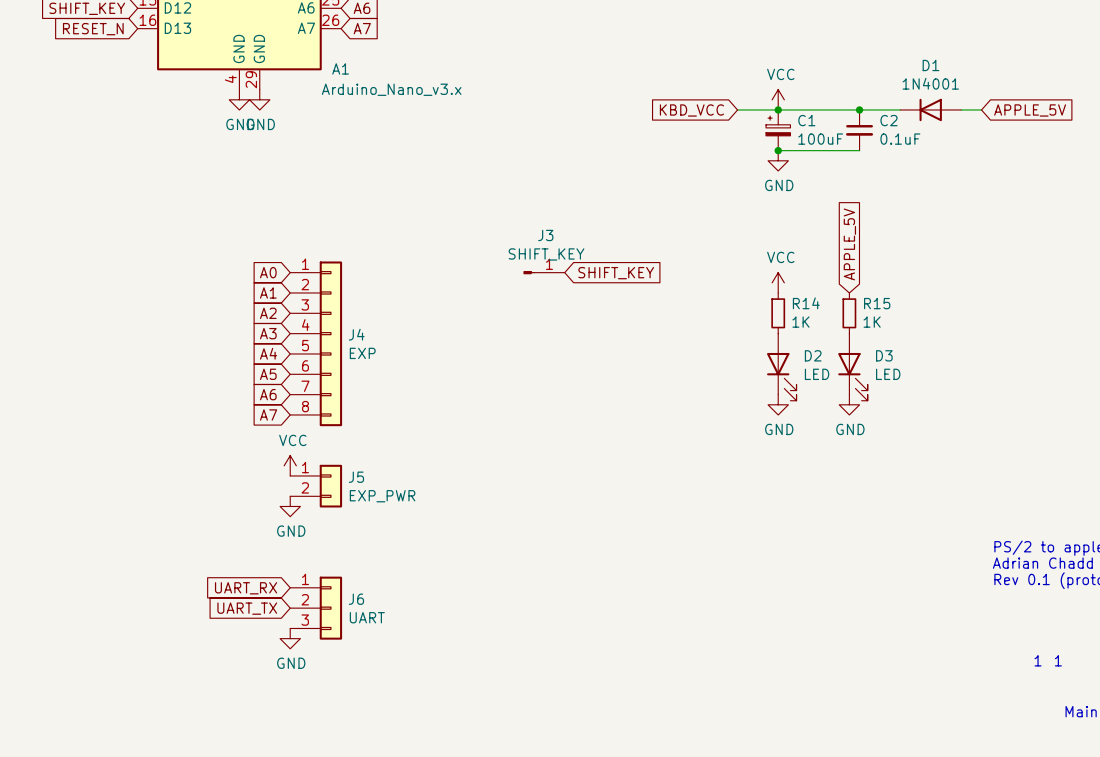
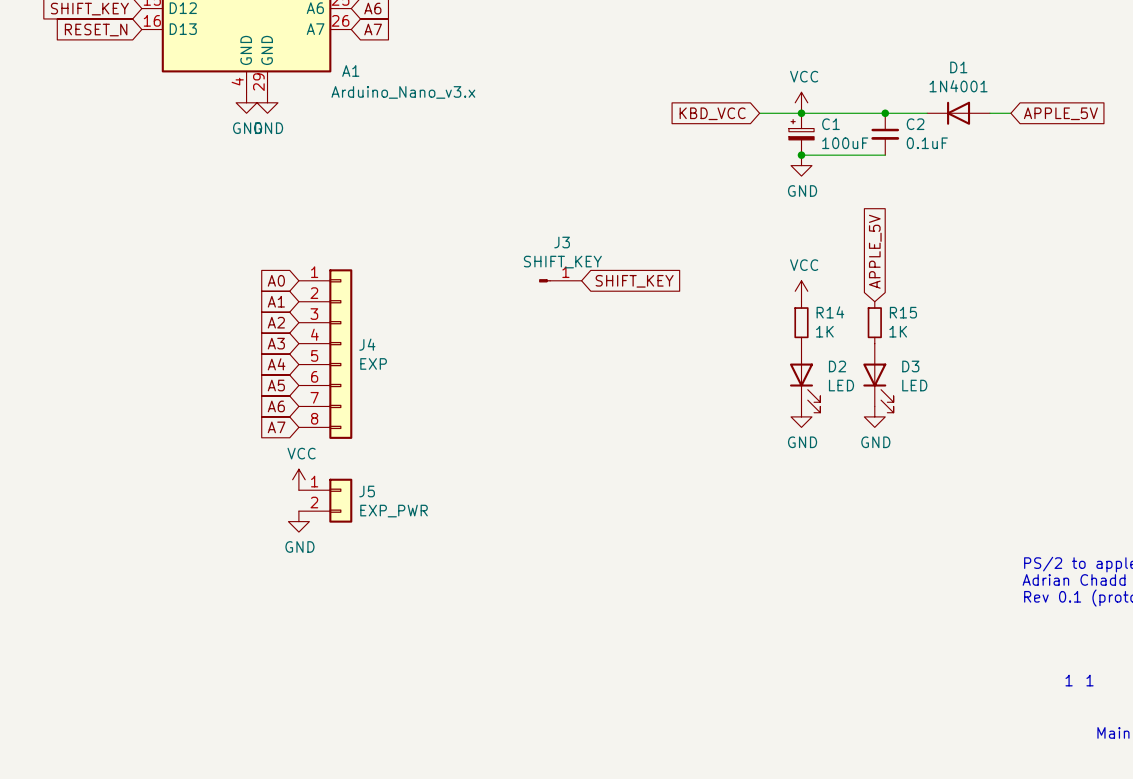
global label: UART_RX (246, 588) -> none
global label: UART_TX (247, 608) -> none
J6: UART (316, 608) -> none
power symbol: GND (290, 638) -> none

